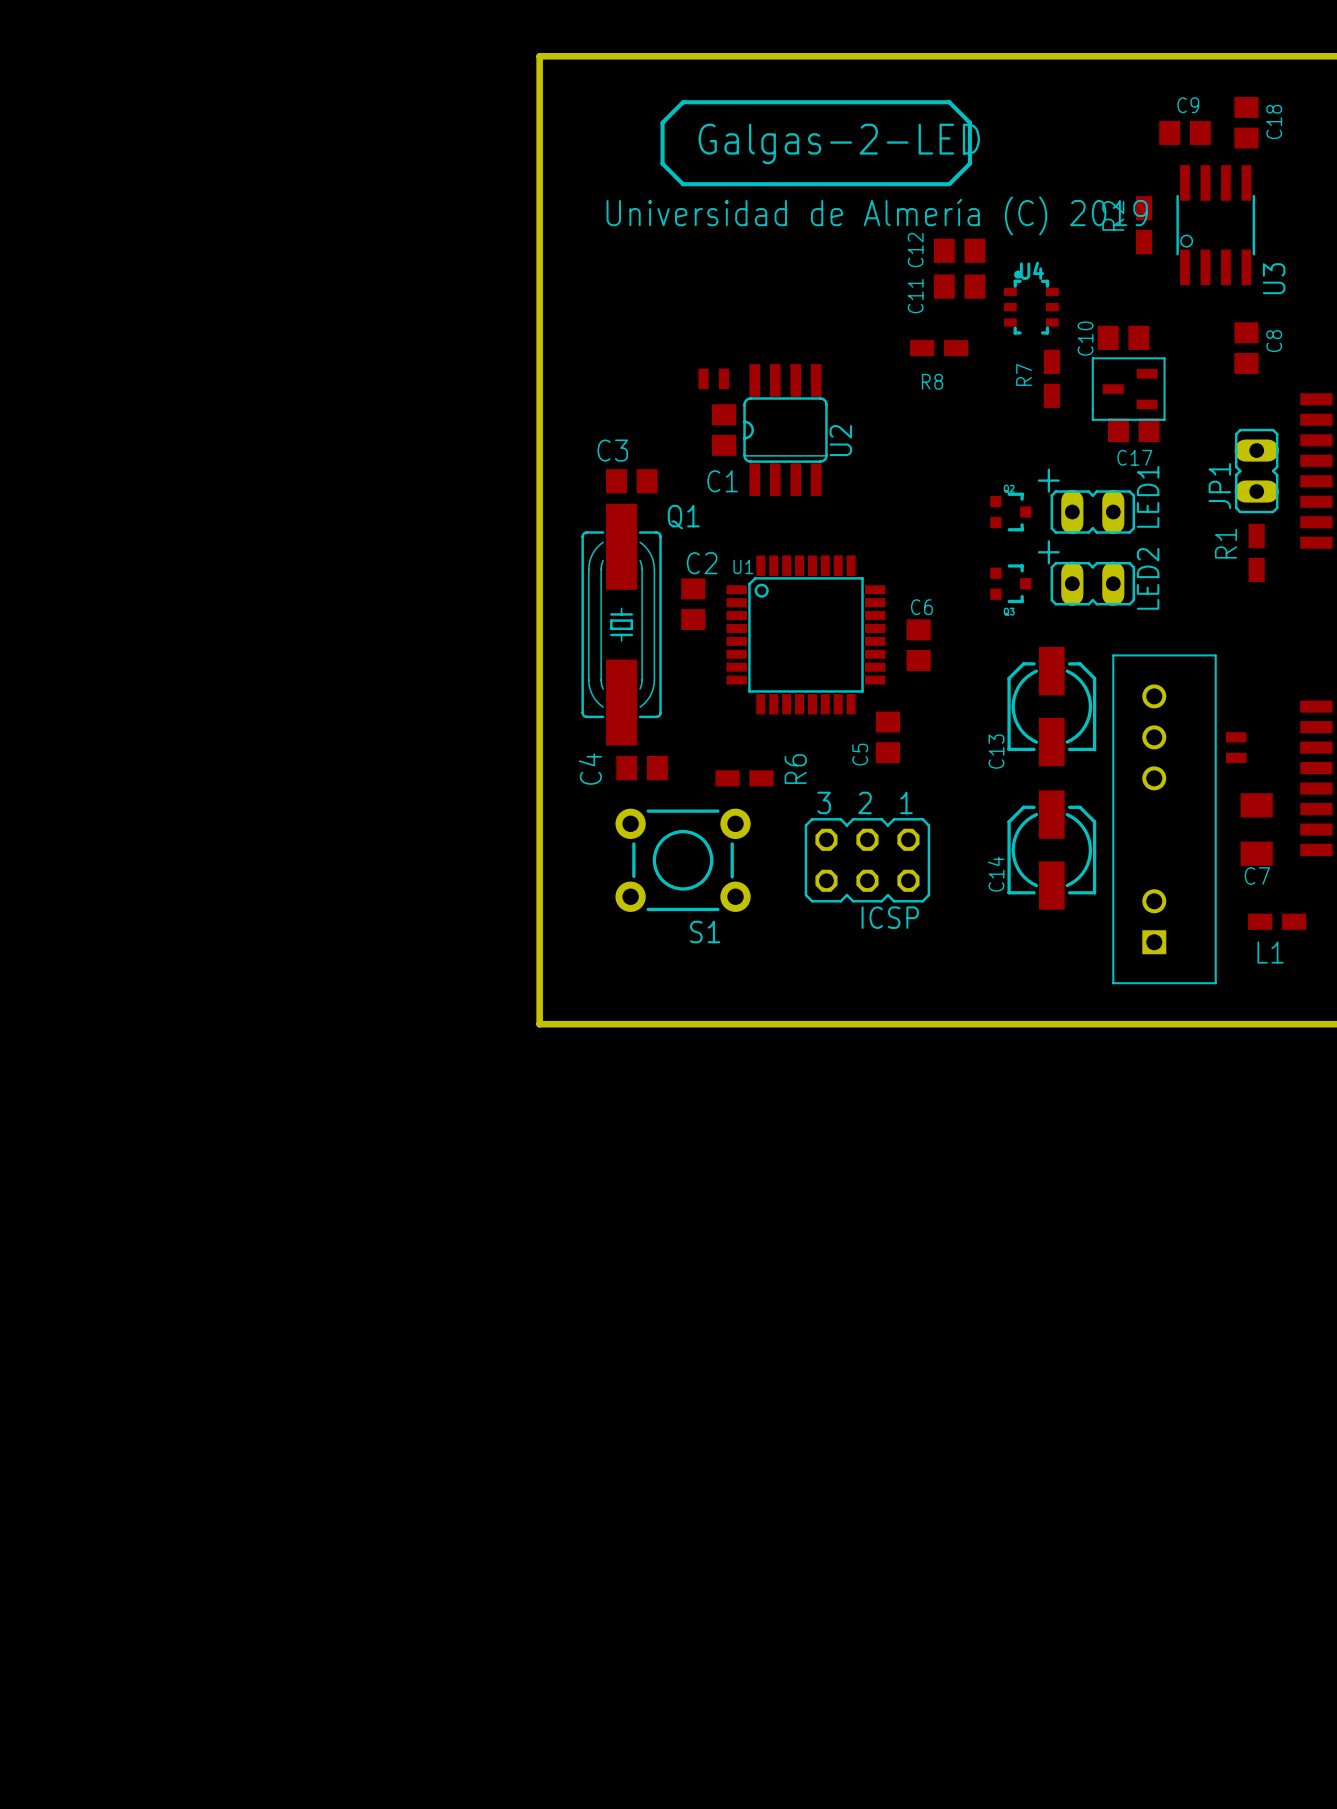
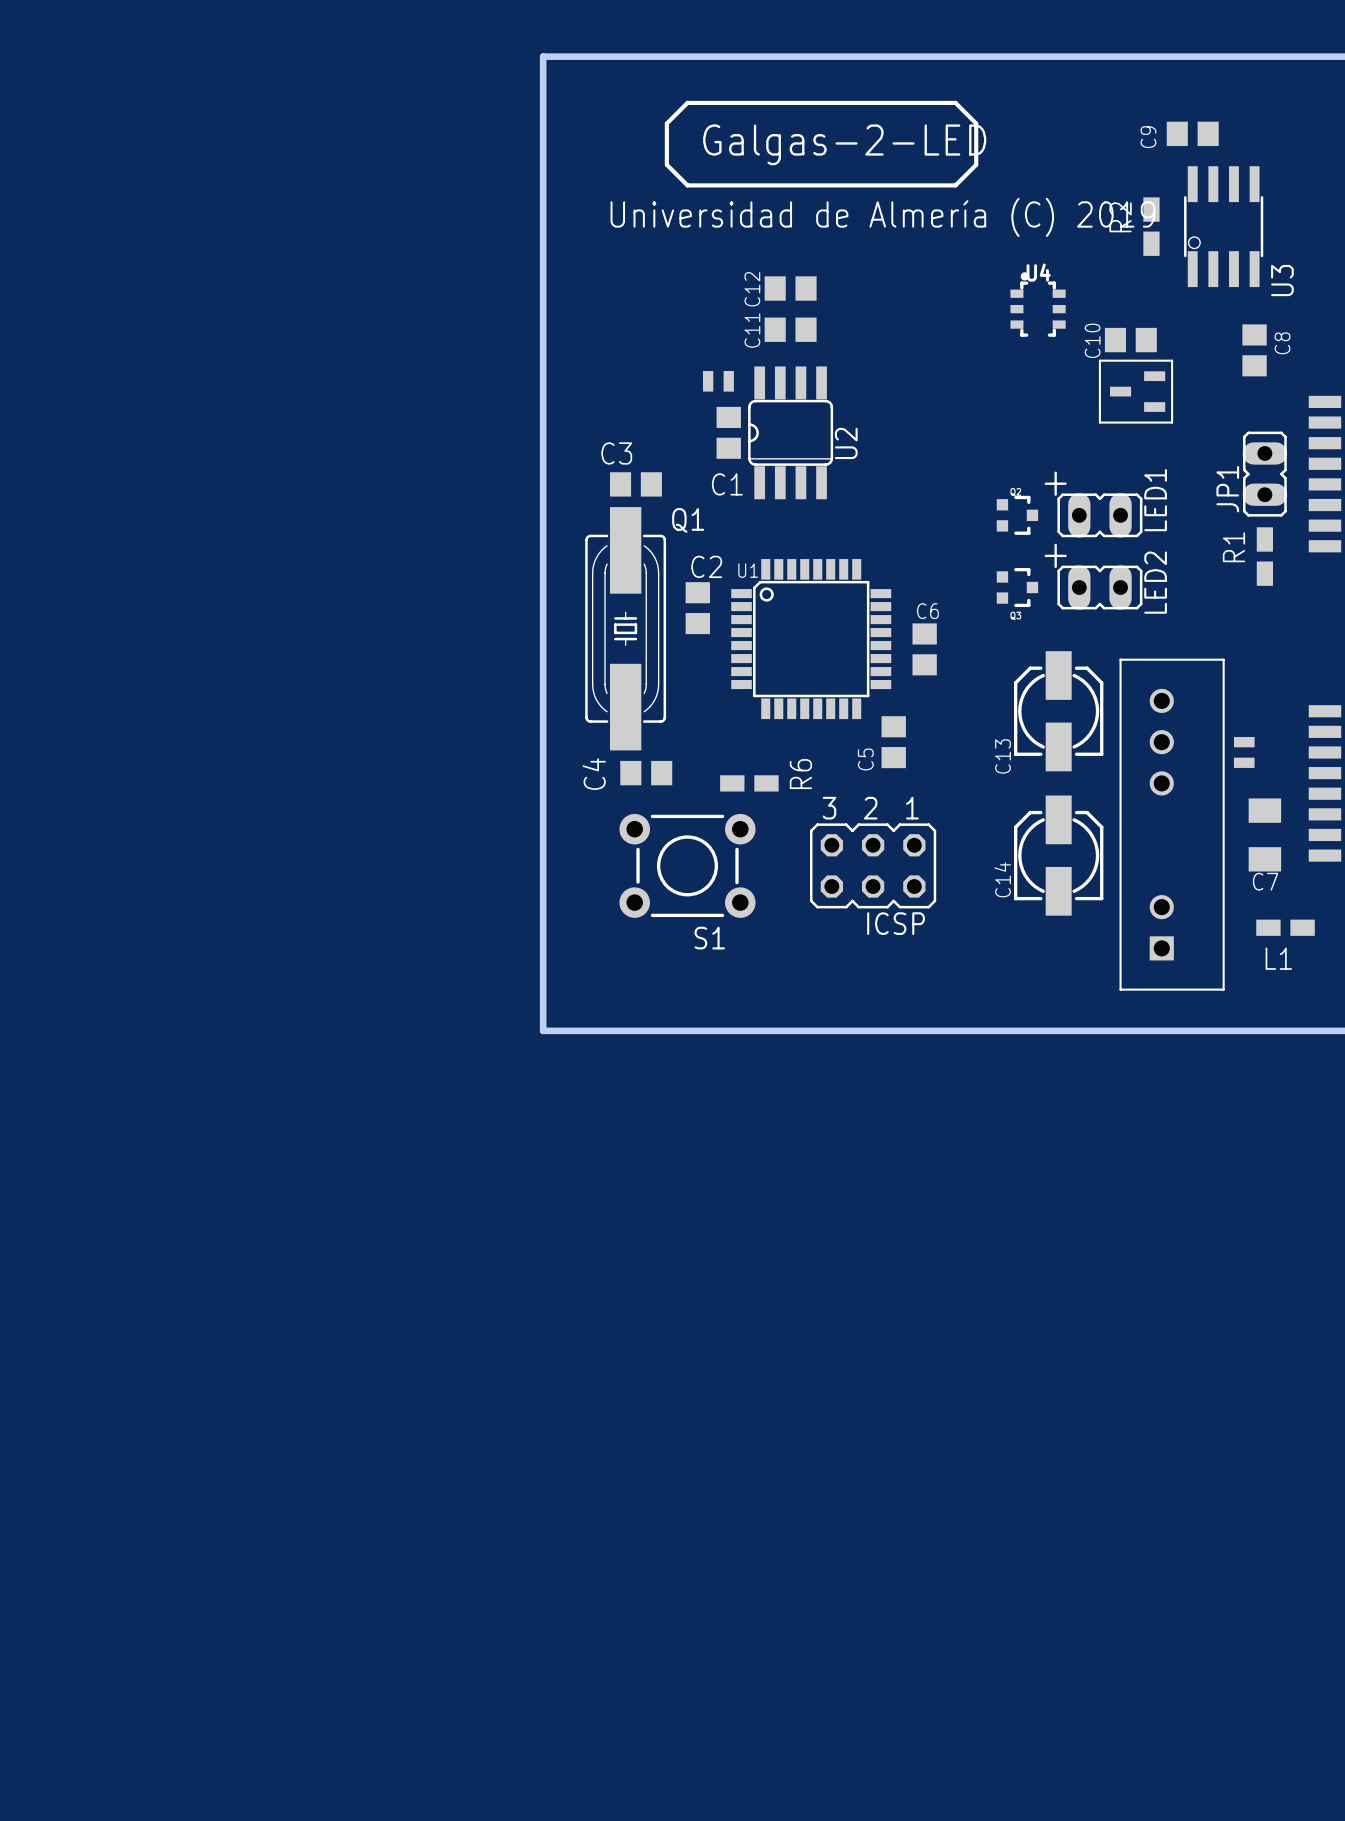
C9 name rotation: 0° (1188, 105) -> 90° counterclockwise (1148, 137)
C9 name position: C9 (1188, 105) -> C9 (1148, 137)
C18: (1246, 122) -> none
C12 name position: C12 (915, 250) -> C12 (752, 289)
C12 position: (959, 250) -> (790, 288)
C11 position: (959, 286) -> (790, 329)
C11 name position: C11 (915, 296) -> C11 (752, 330)
R8: (939, 348) -> none
R7: (1051, 378) -> none
C17: (1133, 430) -> none

